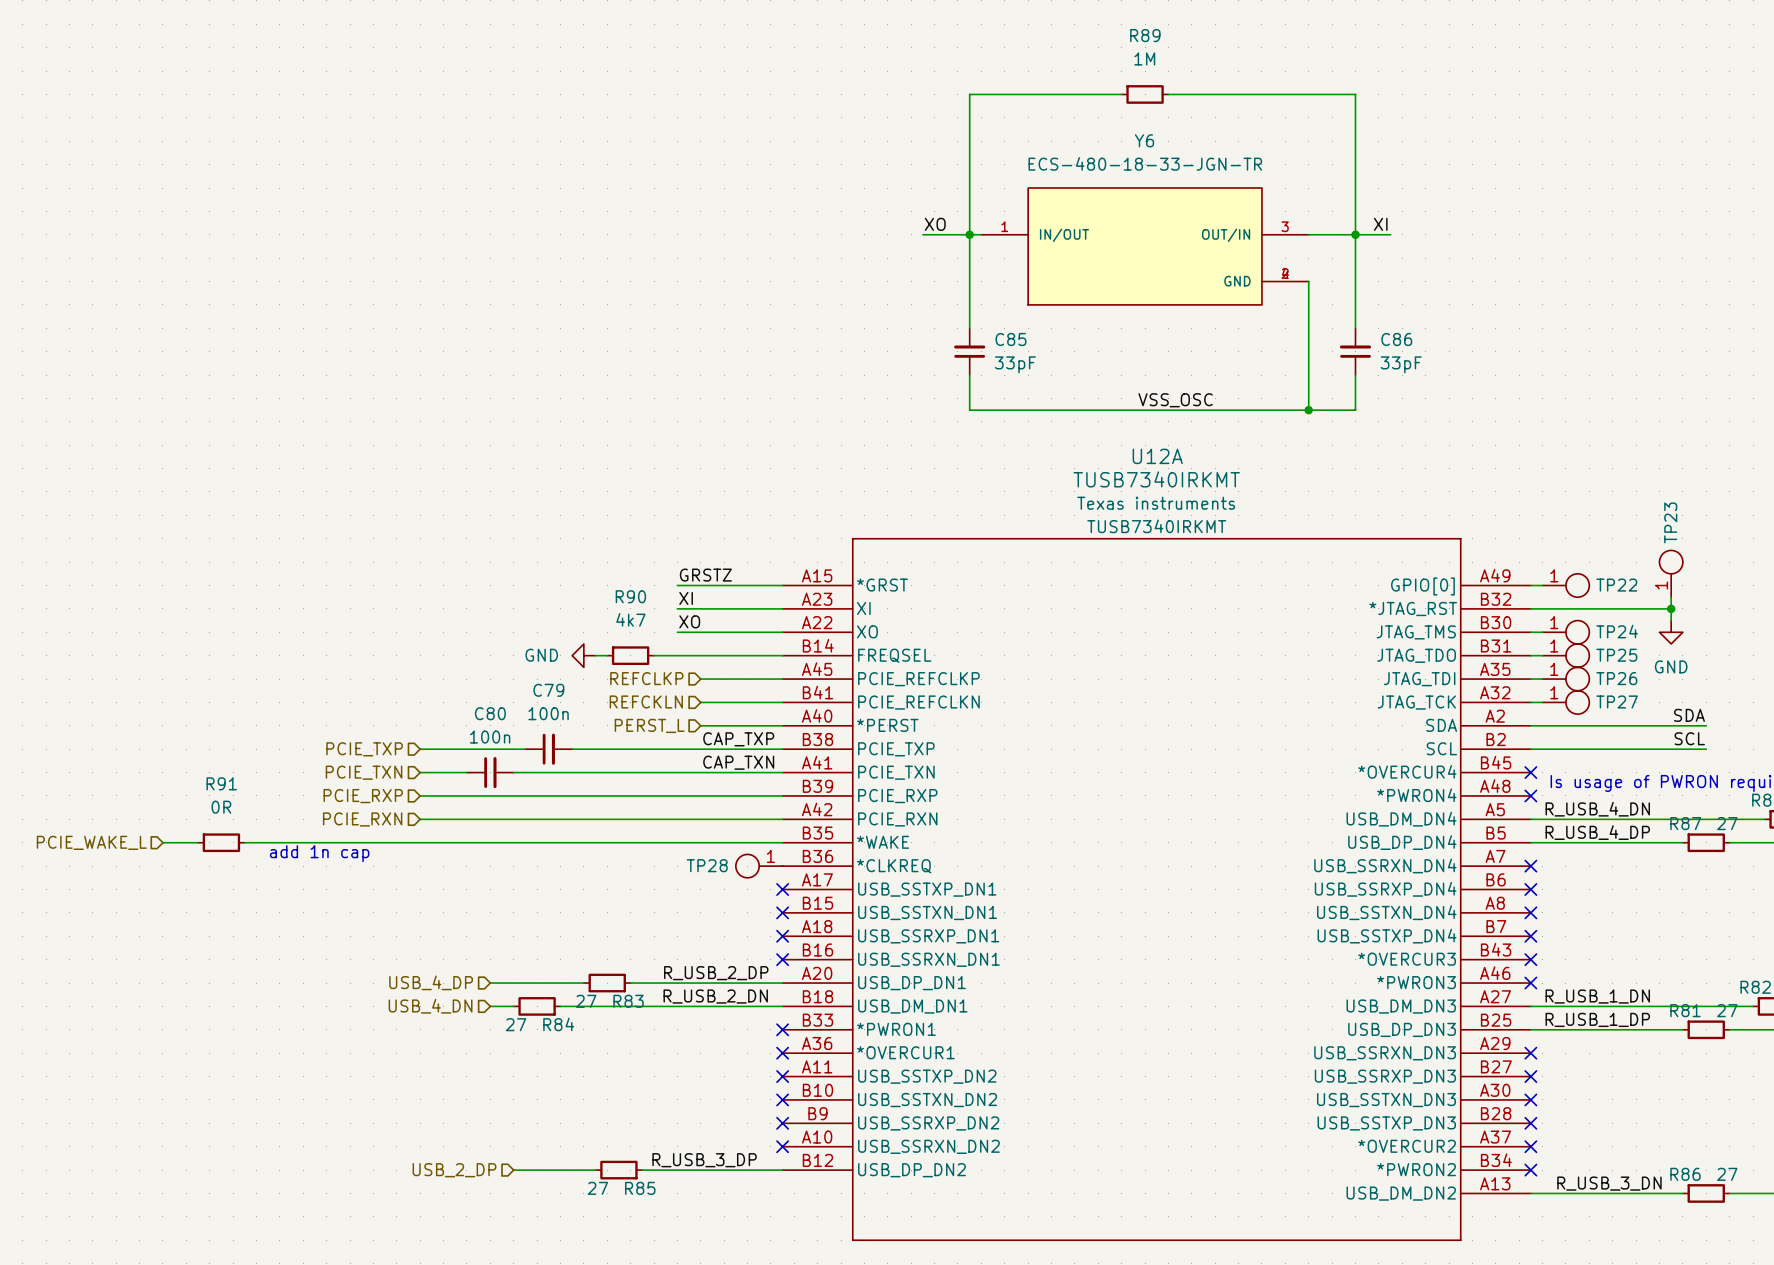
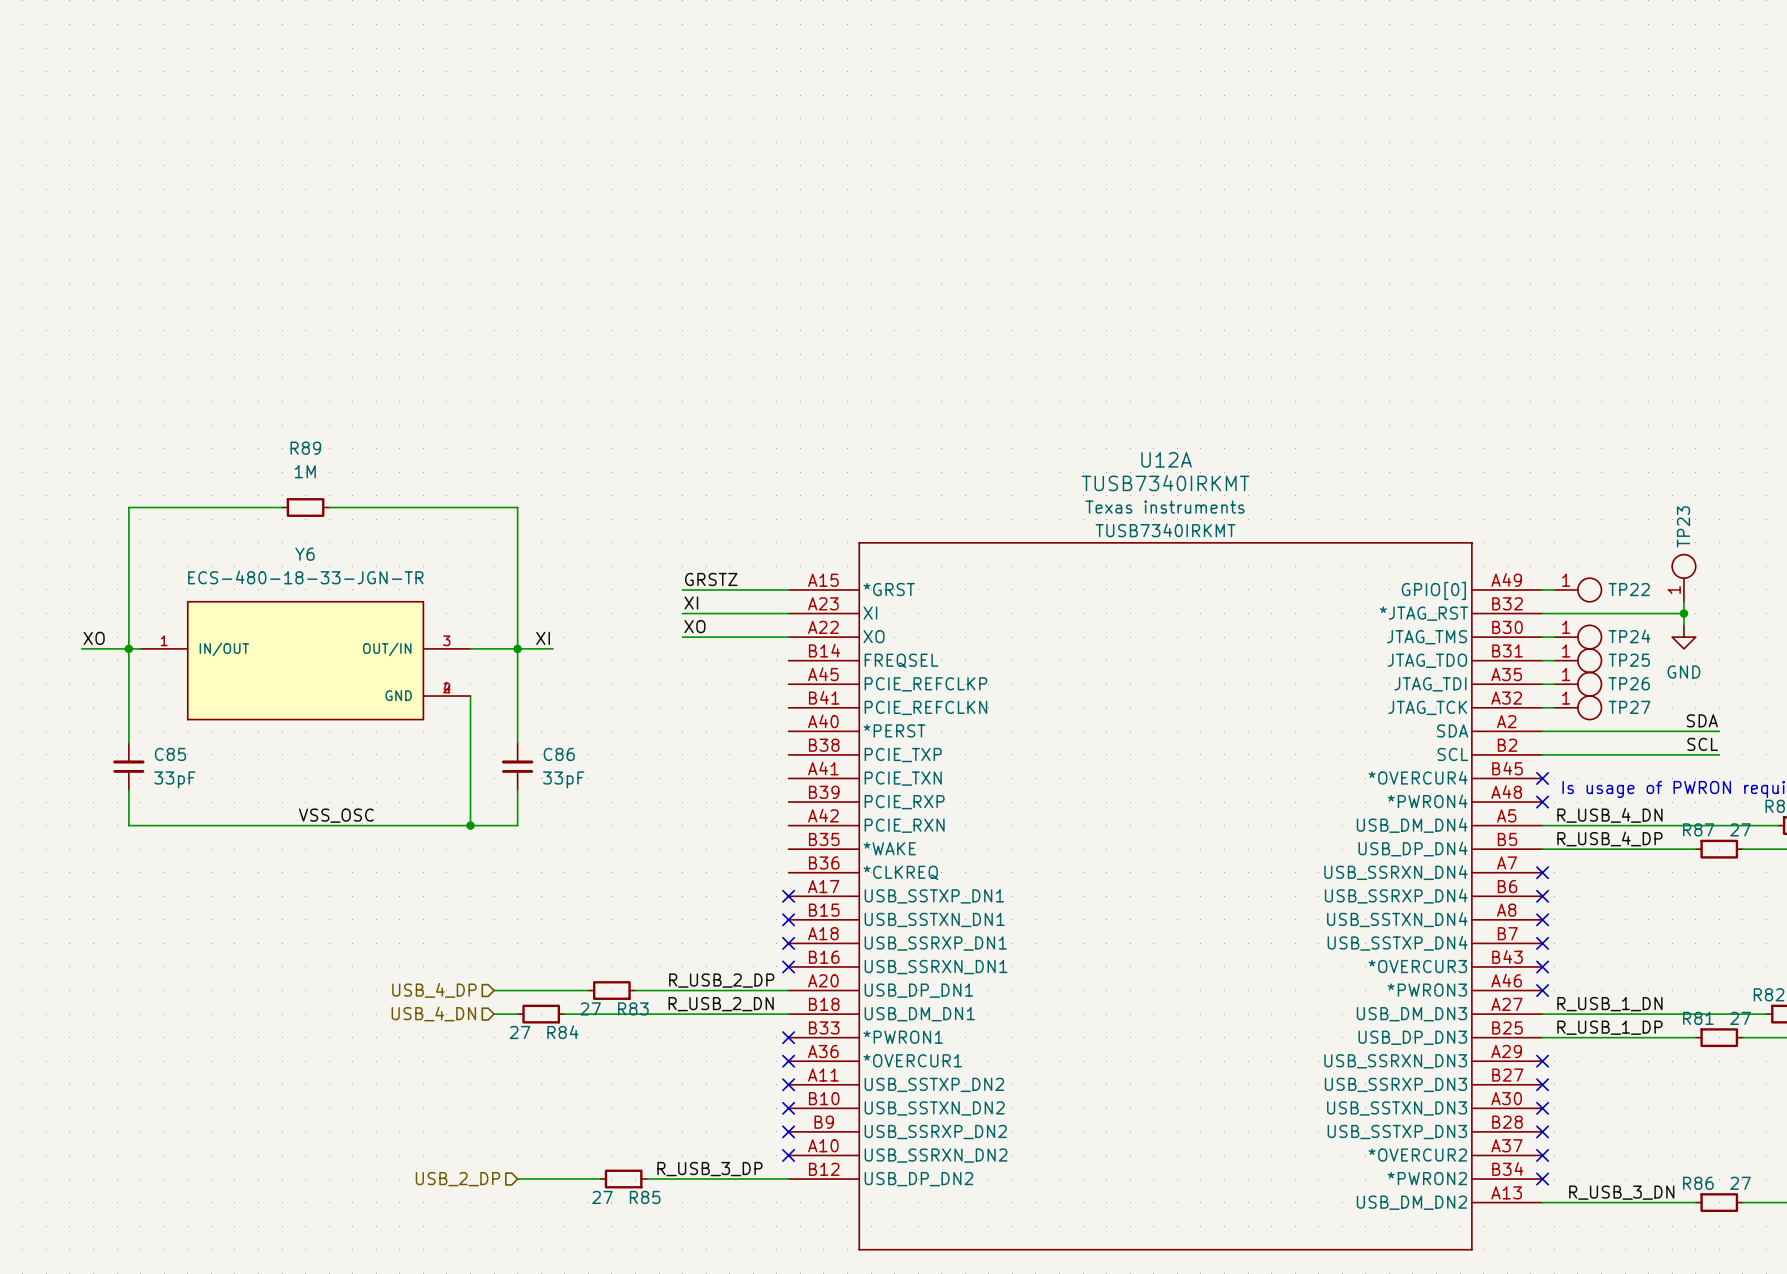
wire: (1121, 94) (969, 94) (969, 328) -> none
R89 position: (1145, 94) -> (305, 507)
wire: (1168, 94) (1355, 94) (1355, 328) -> none
label: XO (935, 224) -> none
label: XI (1380, 224) -> none
wire: (922, 234) (981, 234) -> none
junction: (969, 234) -> none
wire: (1308, 234) (1390, 234) -> none
junction: (1355, 234) -> none
Y6 position: (1145, 246) -> (305, 660)
wire: (1308, 281) (1308, 410) -> none
C85 position: (969, 351) -> (128, 766)
C86 position: (1355, 351) -> (517, 766)
wire: (969, 375) (969, 410) (1355, 410) (1355, 375) -> none
label: VSS_OSC (1175, 400) -> none
junction: (1308, 410) -> none
wire: none -> (282, 507) (128, 507) (128, 743)
wire: none -> (329, 507) (517, 507) (517, 743)
label: none -> XO (94, 638)
label: none -> XI (543, 638)
wire: none -> (81, 648) (140, 648)
junction: none -> (128, 648)
wire: none -> (470, 648) (552, 648)
junction: none -> (517, 648)
power symbol: GND (583, 655) -> none
wire: (595, 655) (607, 655) -> none
R90: (630, 655) -> none
wire: (654, 655) (782, 655) -> none
hierarchical label: REFCLKP (646, 678) -> none
wire: (700, 679) (782, 679) -> none
wire: none -> (470, 696) (470, 825)
hierarchical label: REFCKLN (646, 701) -> none
wire: (700, 702) (782, 702) -> none
hierarchical label: PERST_L (649, 725) -> none
wire: (700, 725) (782, 725) -> none
label: CAP_TXP (738, 739) -> none
hierarchical label: PCIE_TXP (364, 749) -> none
wire: (420, 749) (525, 749) -> none
C79: (548, 749) -> none
wire: (572, 749) (782, 749) -> none
label: CAP_TXN (738, 762) -> none
hierarchical label: PCIE_TXN (364, 772) -> none
wire: (420, 772) (466, 772) -> none
C80: (490, 772) -> none
wire: (513, 772) (782, 772) -> none
wire: none -> (128, 790) (128, 825) (423, 825)
wire: (420, 795) (782, 795) -> none
hierarchical label: PCIE_RXP (363, 796) -> none
label: none -> VSS_OSC (336, 815)
hierarchical label: PCIE_RXN (362, 819) -> none
junction: none -> (470, 825)
wire: (513, 819) (782, 819) -> (517, 825) (517, 790)
hierarchical label: PCIE_WAKE_L (91, 842) -> none
wire: (162, 842) (198, 842) -> none
R91: (221, 842) -> none
wire: (244, 842) (782, 842) -> none
text: add 1n cap (319, 853) -> none
TP28: (759, 866) -> none

